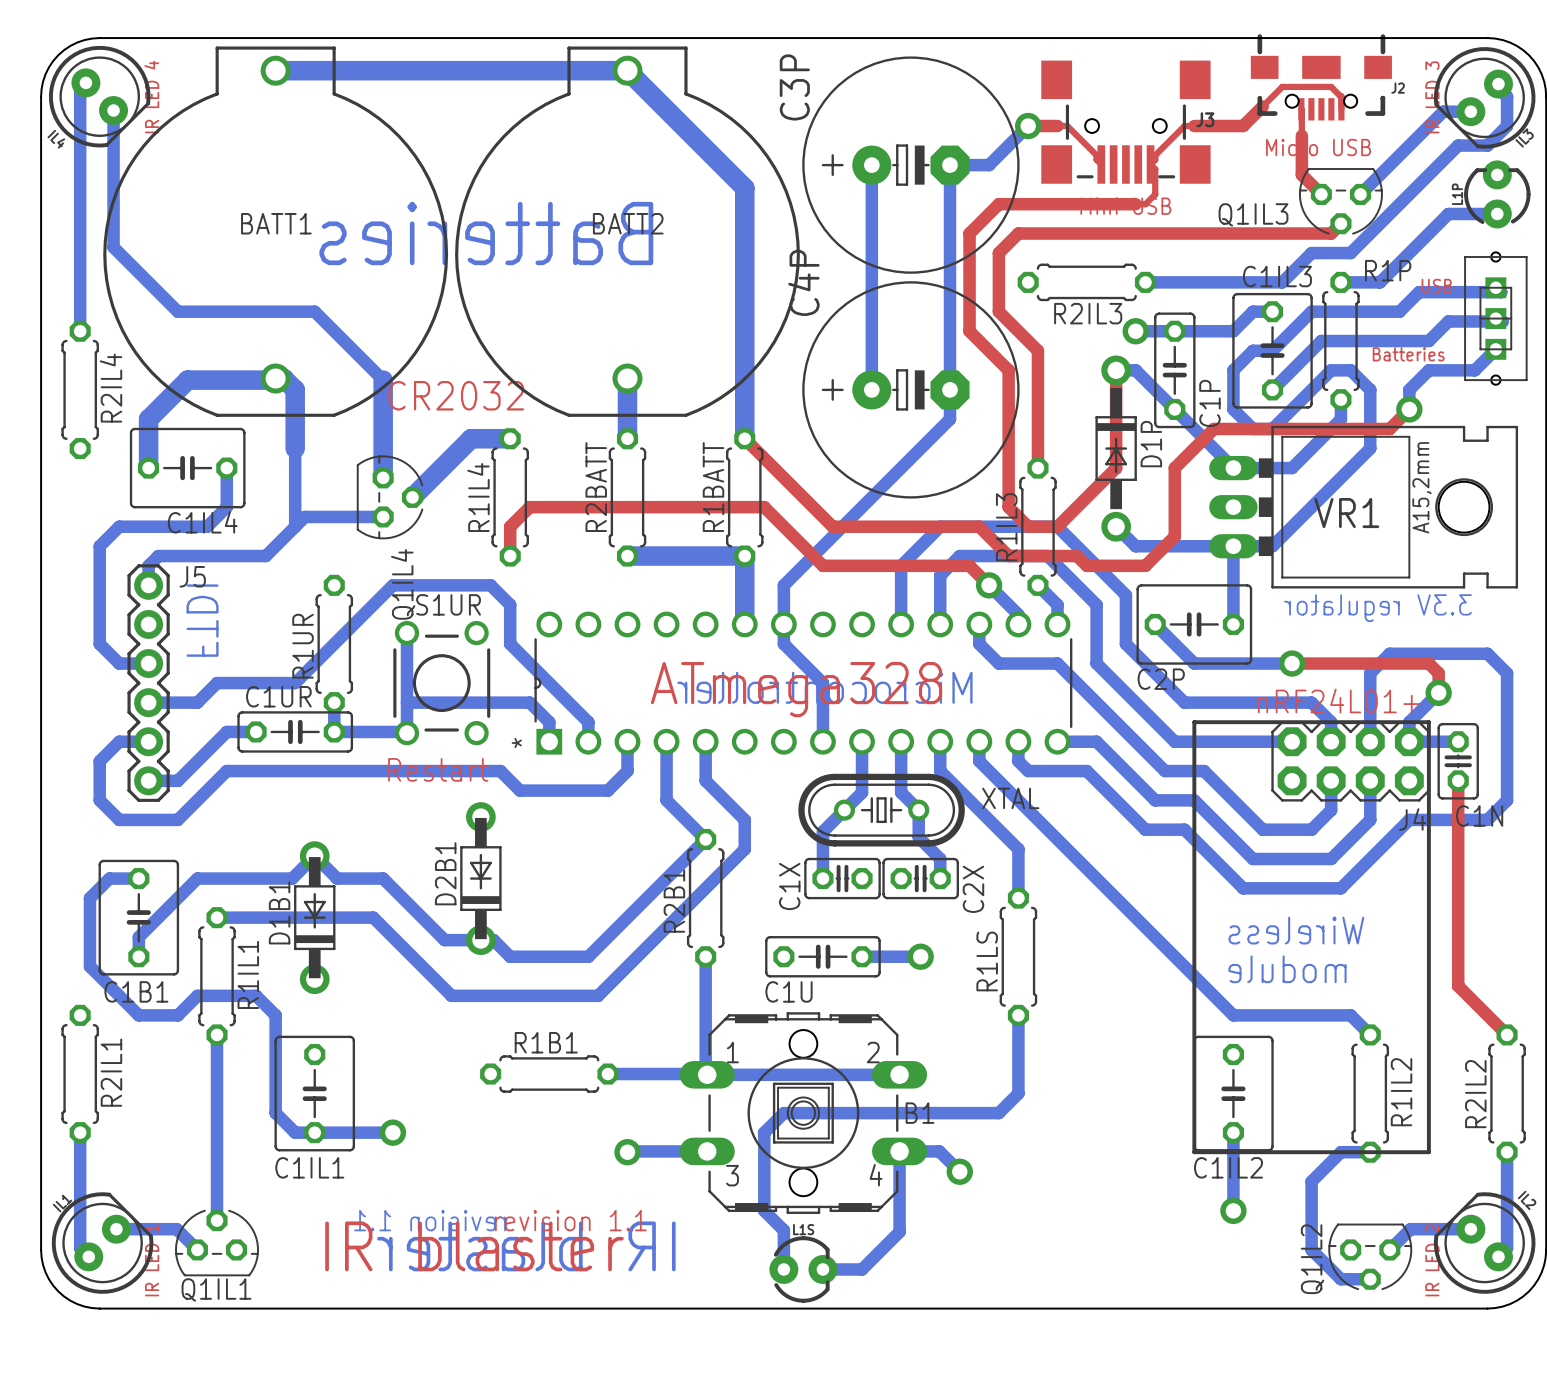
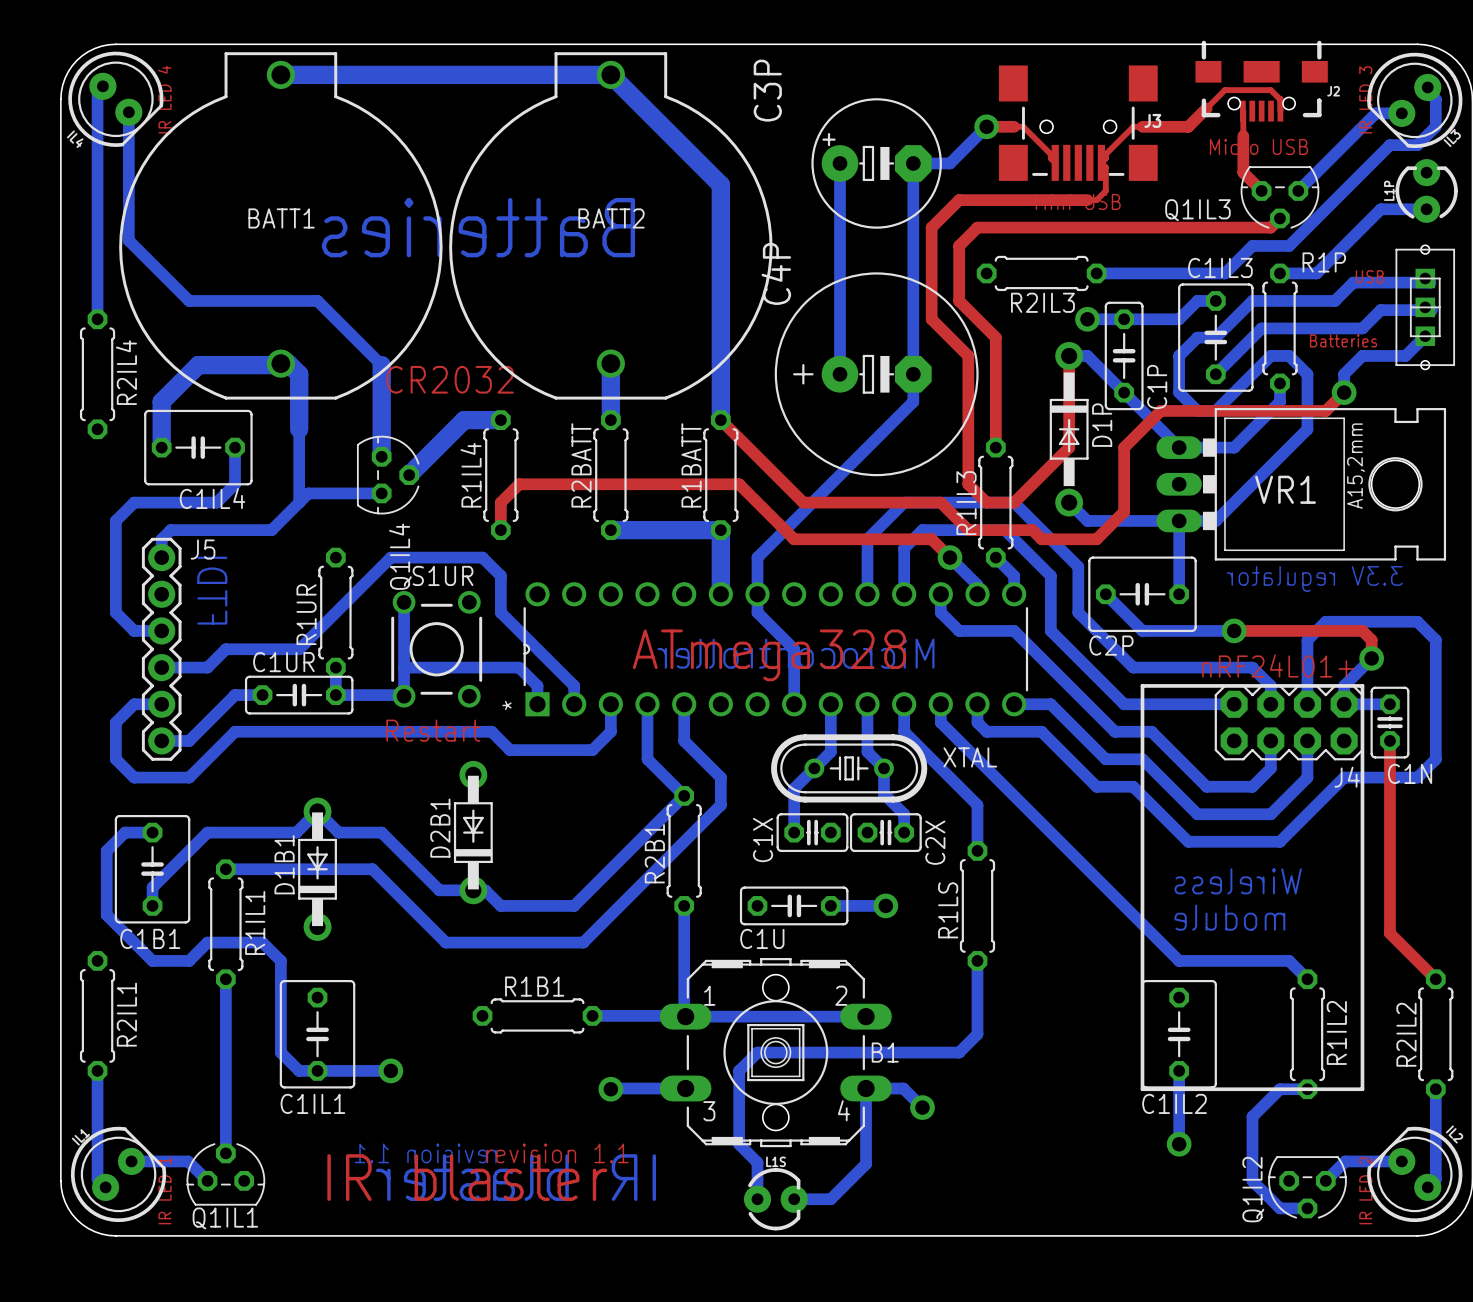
C3P footprint: [802, 56, 1020, 274] -> [811, 98, 942, 229]

